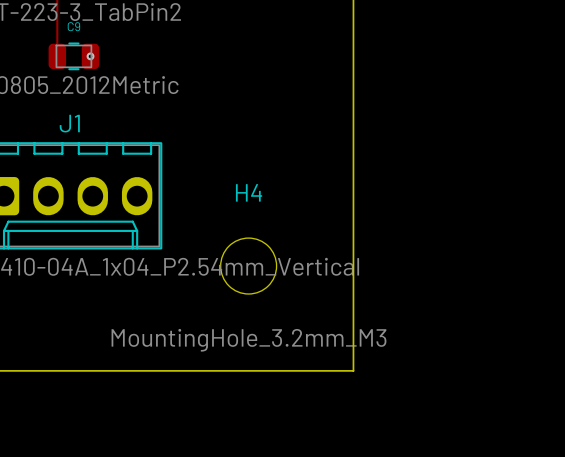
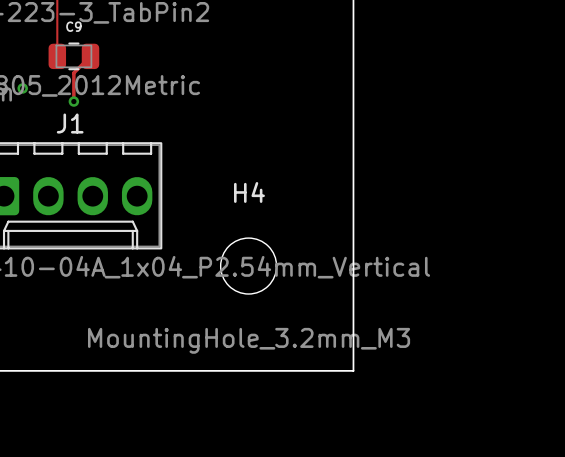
track: none -> (90, 56) (73, 73) (73, 101)
via: (90, 56) -> none
via: none -> (22, 88)
via: none -> (73, 101)

